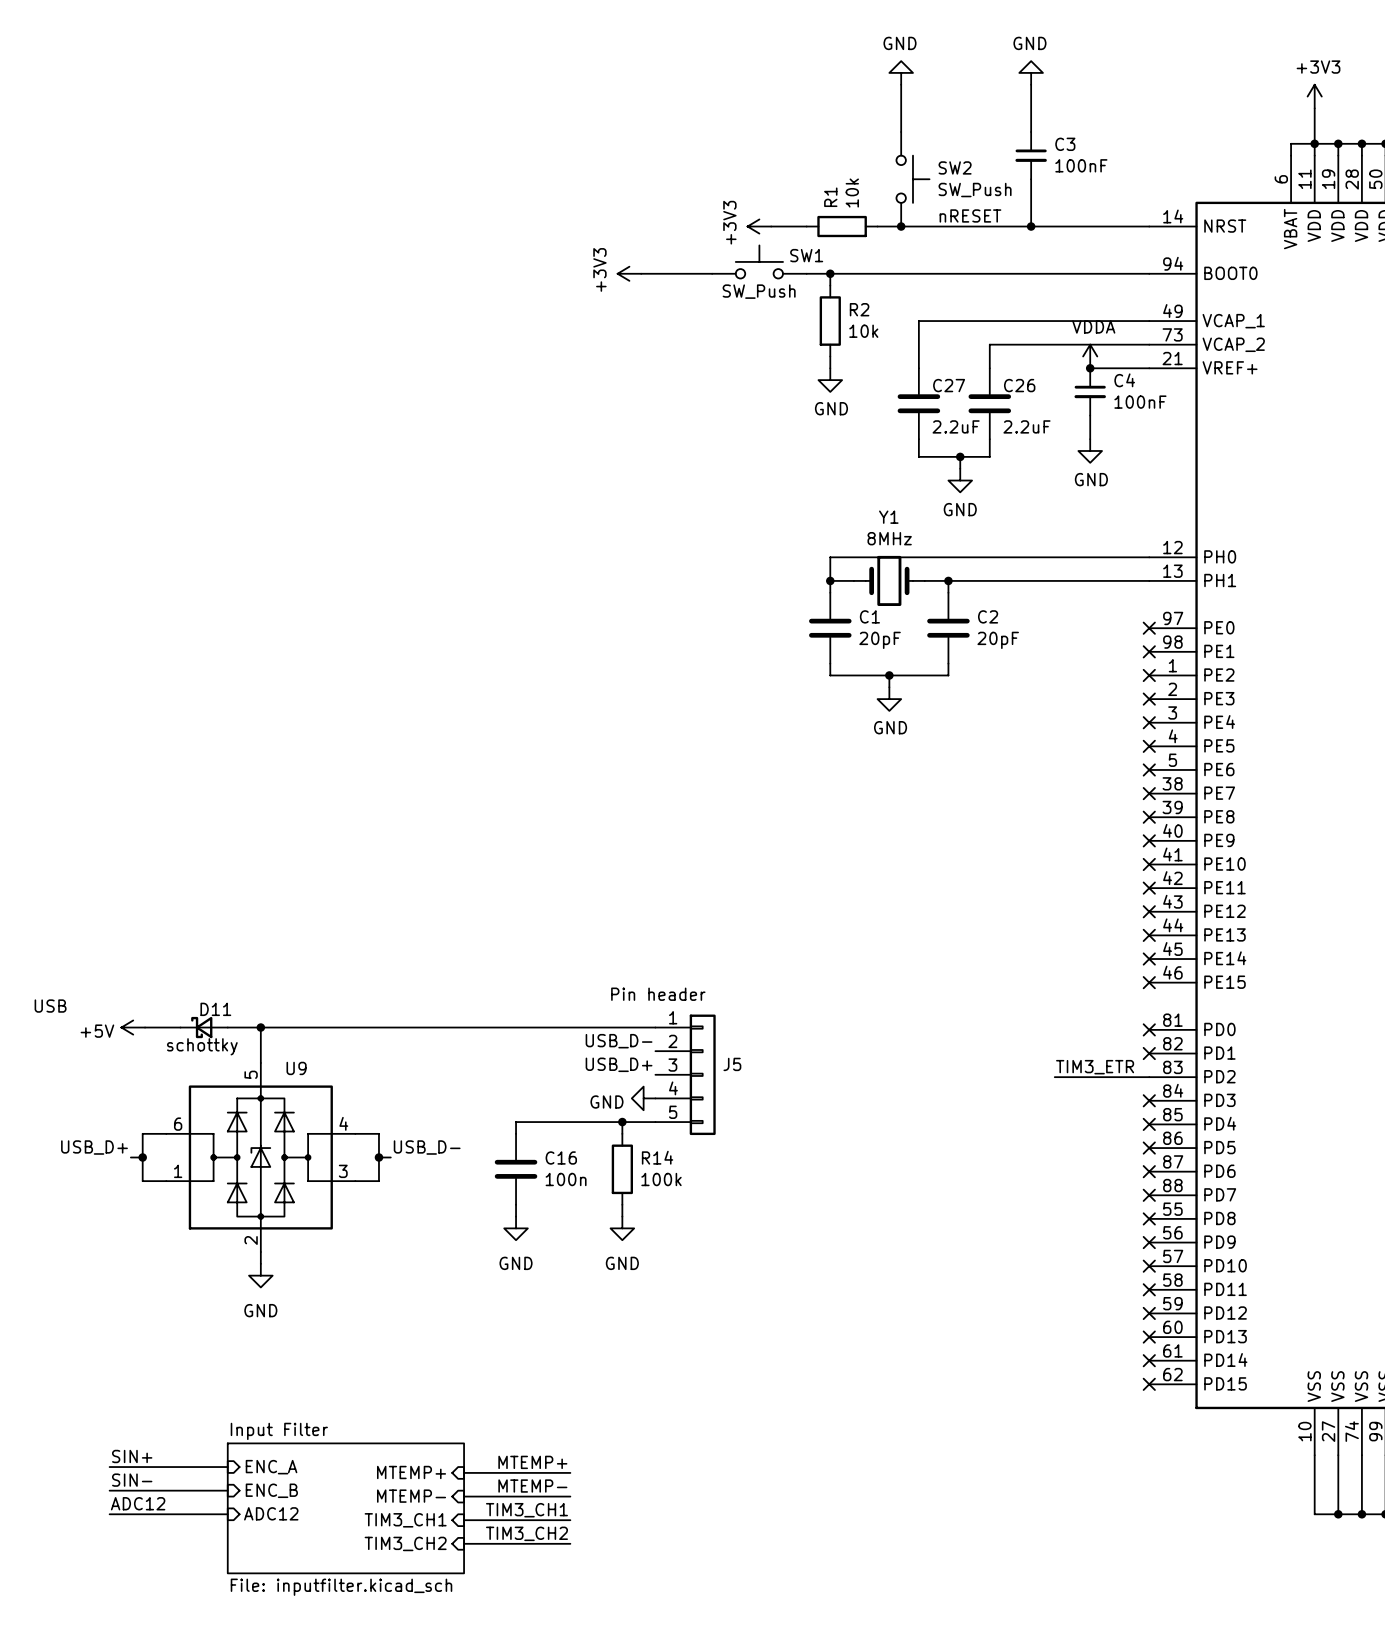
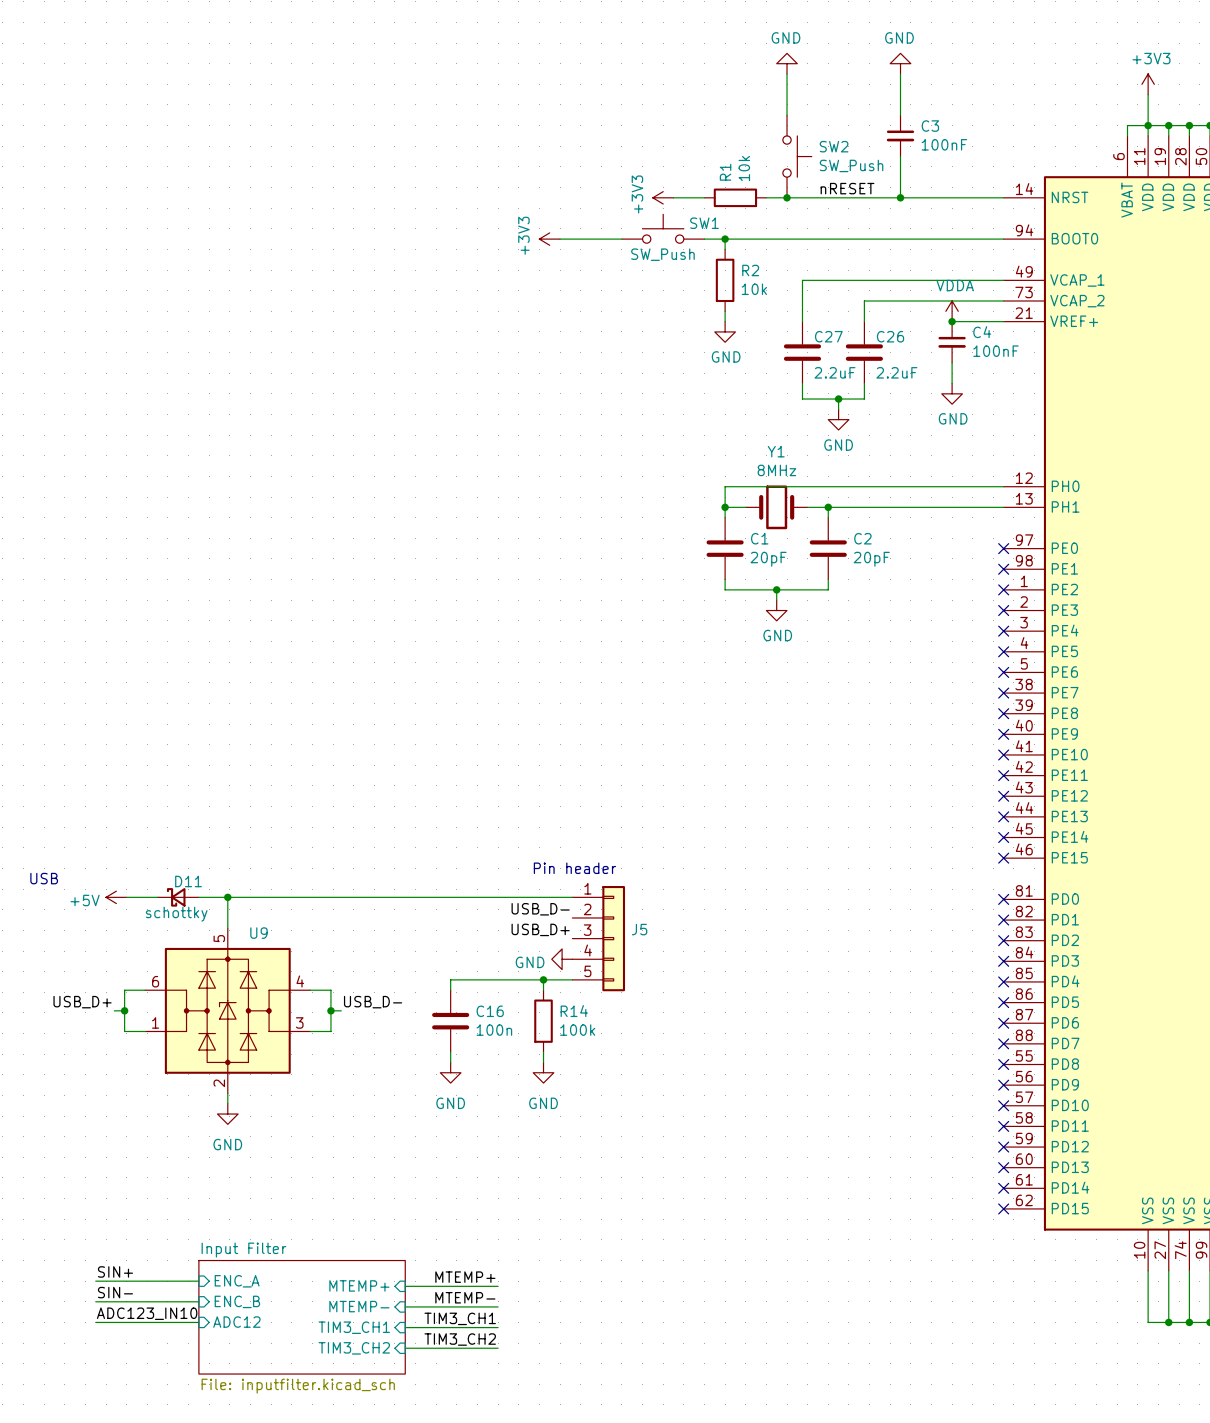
label: TIM3_ETR (1095, 1067) -> none
wire: (1054, 1077) (1149, 1077) -> none
no-connect mark: none -> (1003, 940)
label: ADC12 (138, 1503) -> ADC123_IN10 (147, 1313)

